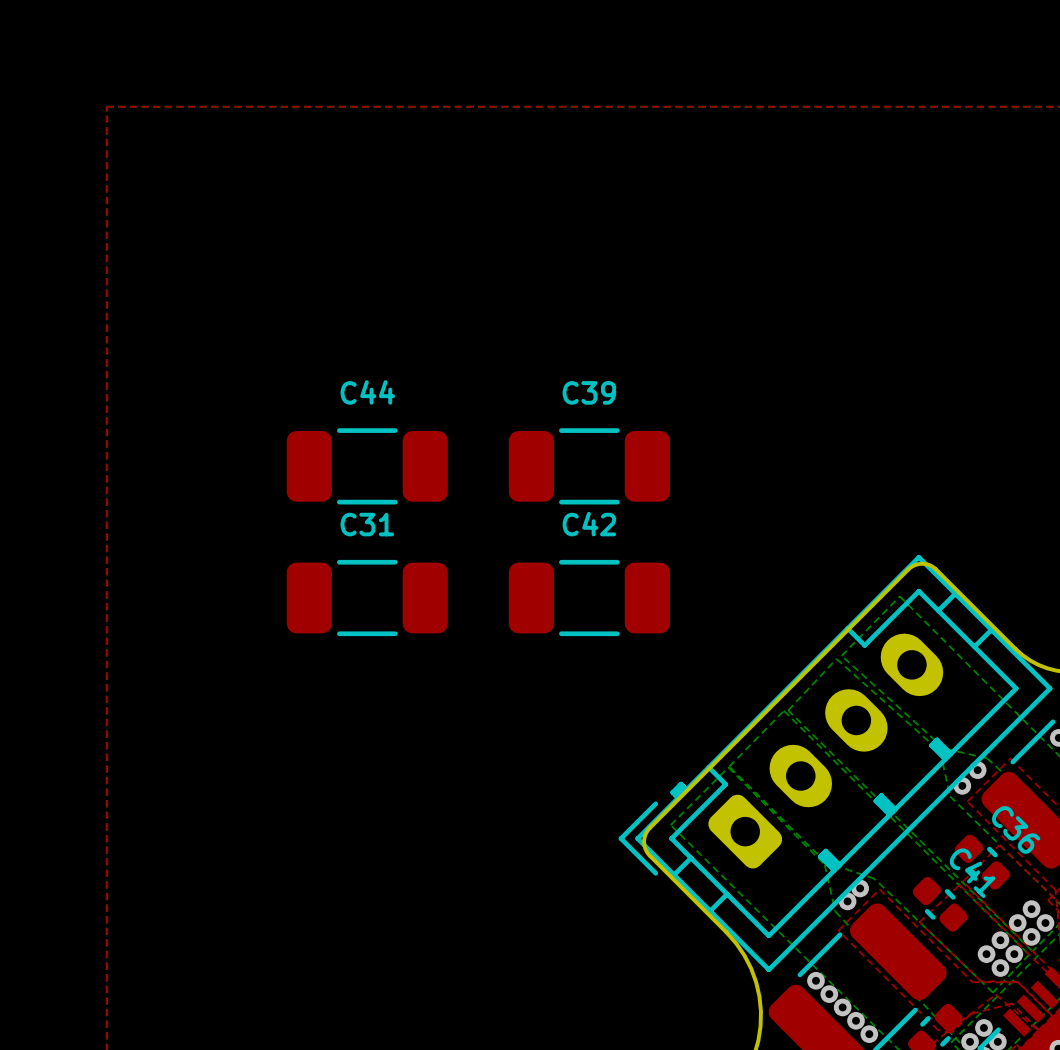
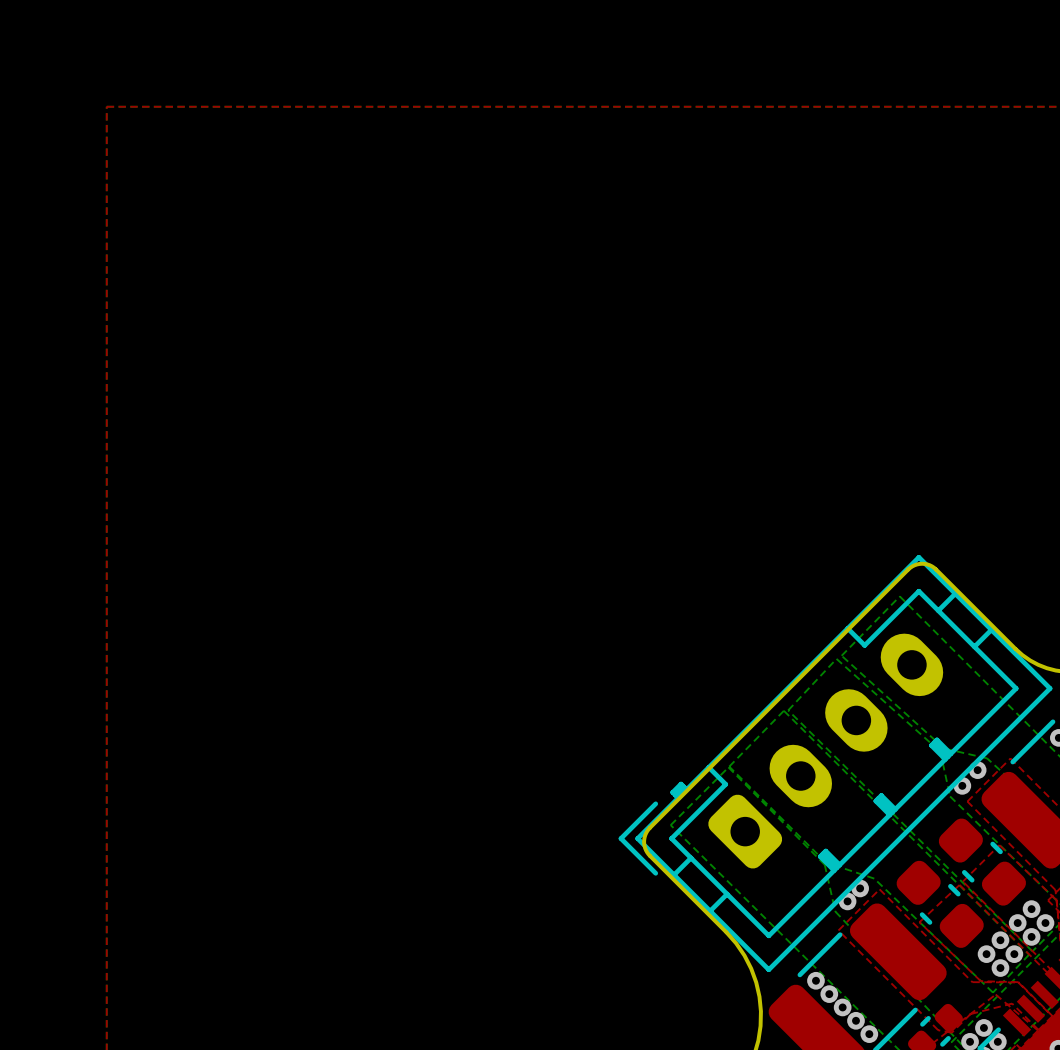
C44: (367, 466) -> none
C39: (589, 466) -> none
C31: (367, 598) -> none
C42: (589, 598) -> none
C36: (982, 862) -> none
part: none -> (982, 862)
C41: (940, 904) -> none
part: none -> (940, 904)

